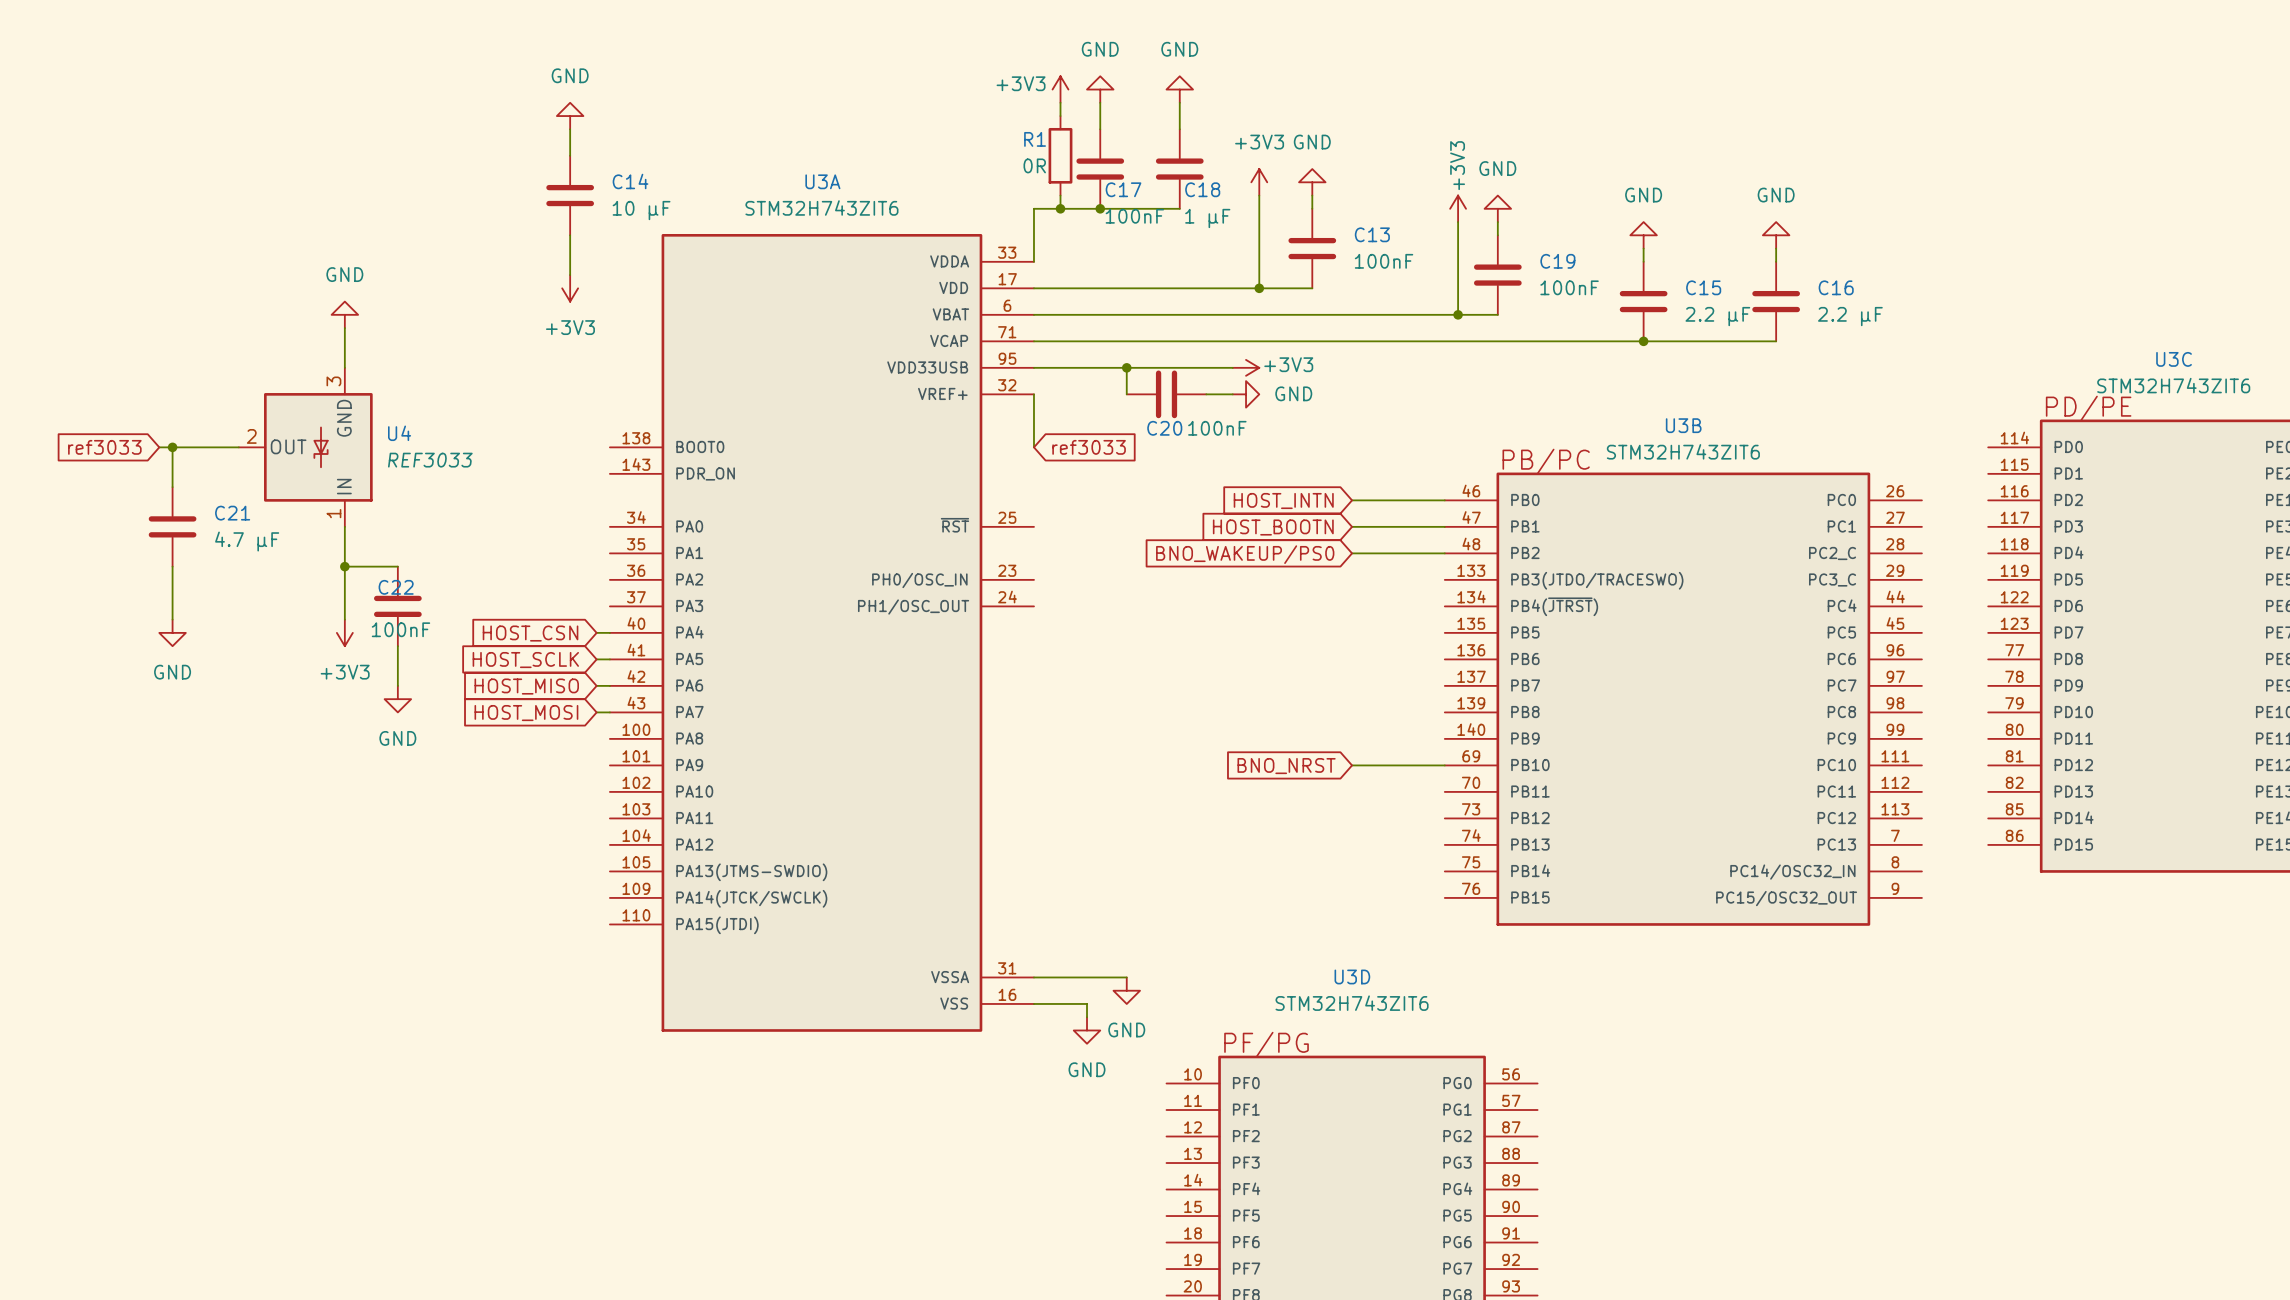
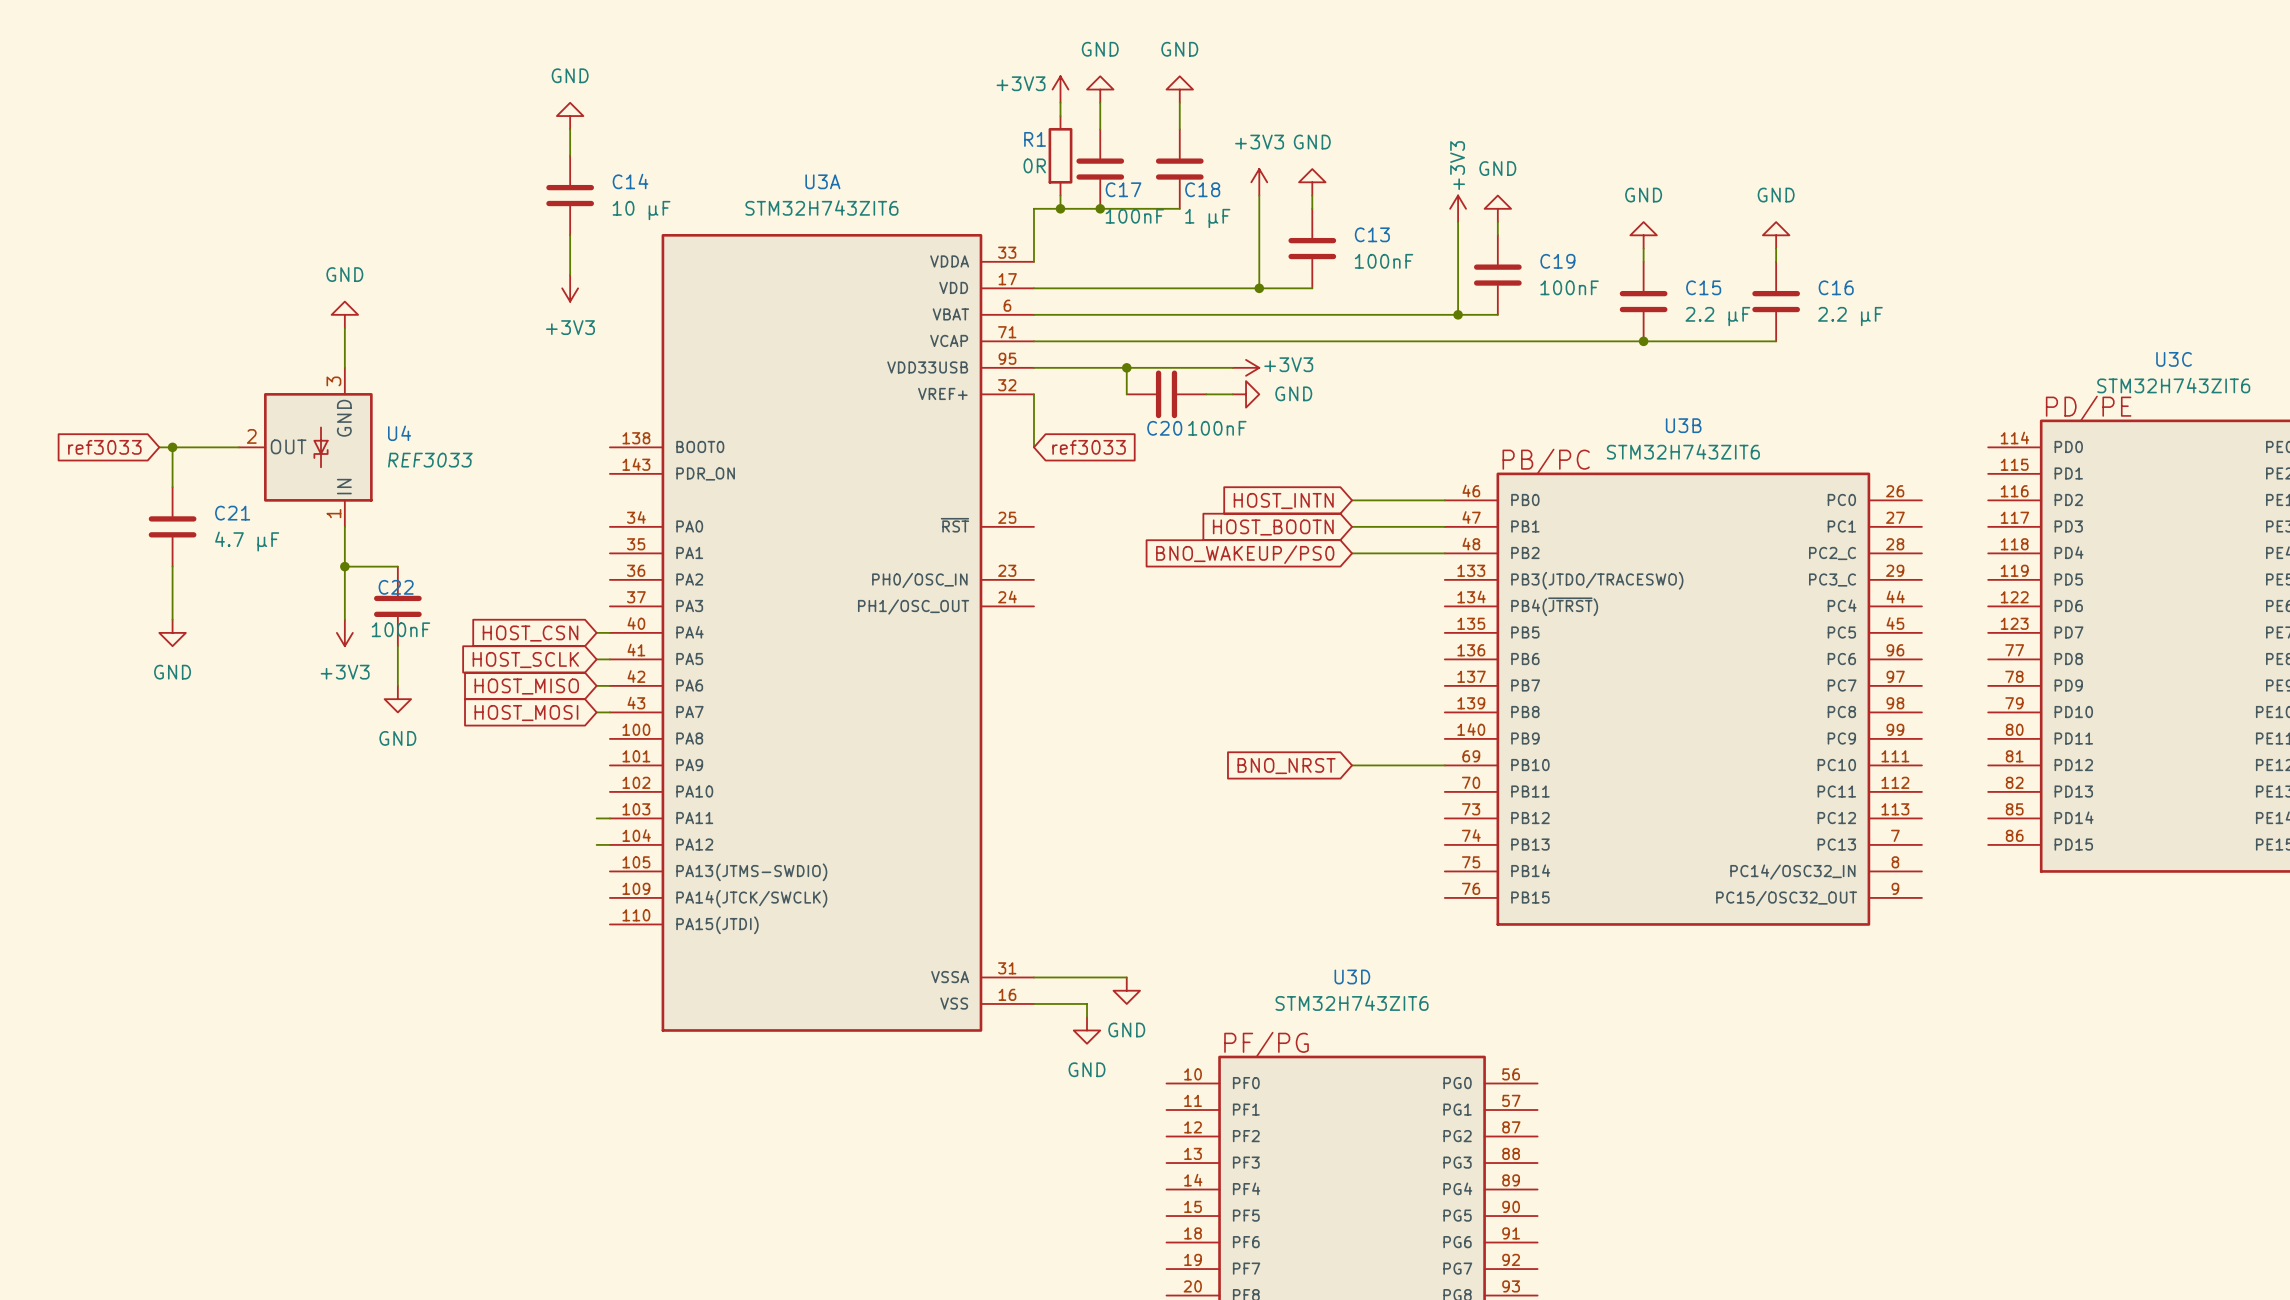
wire: none -> (596, 818) (609, 818)
wire: none -> (596, 844) (609, 844)

